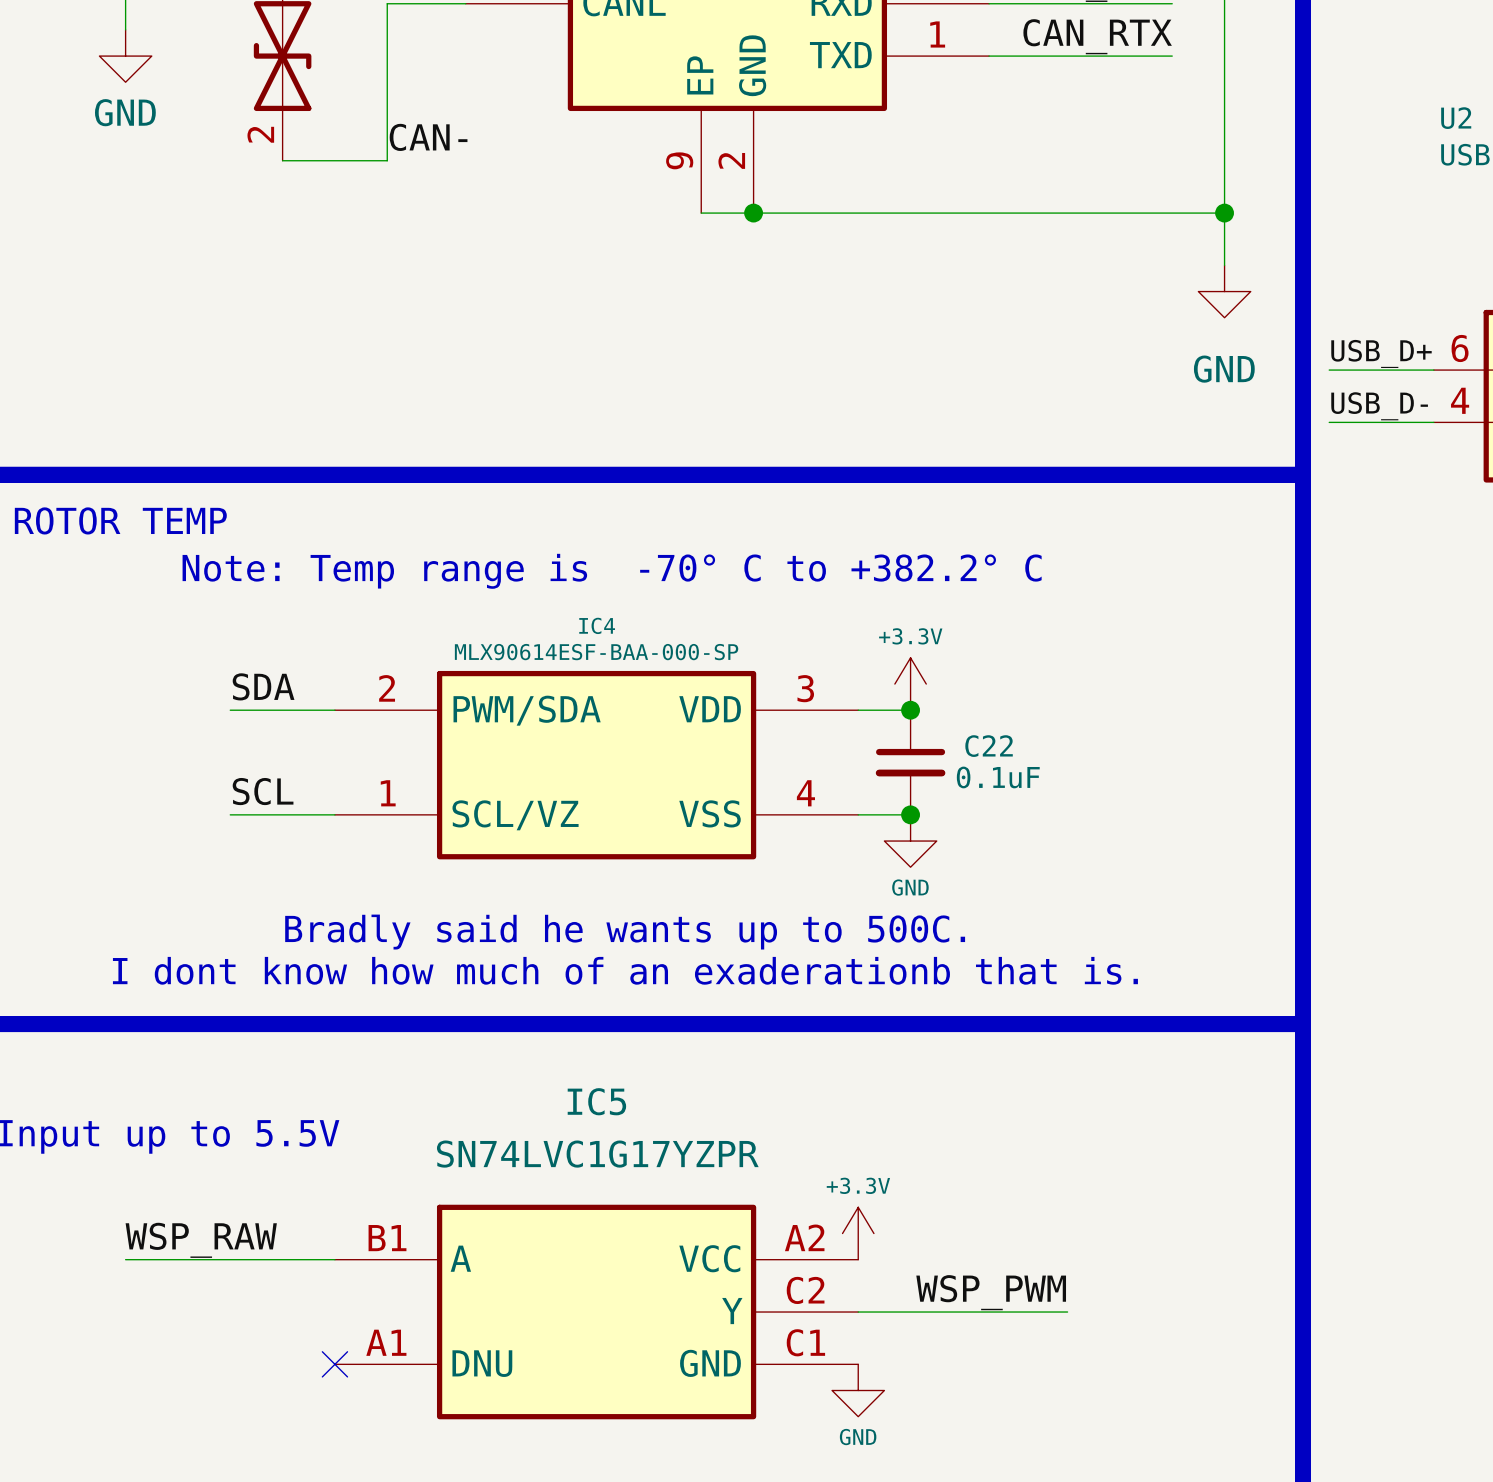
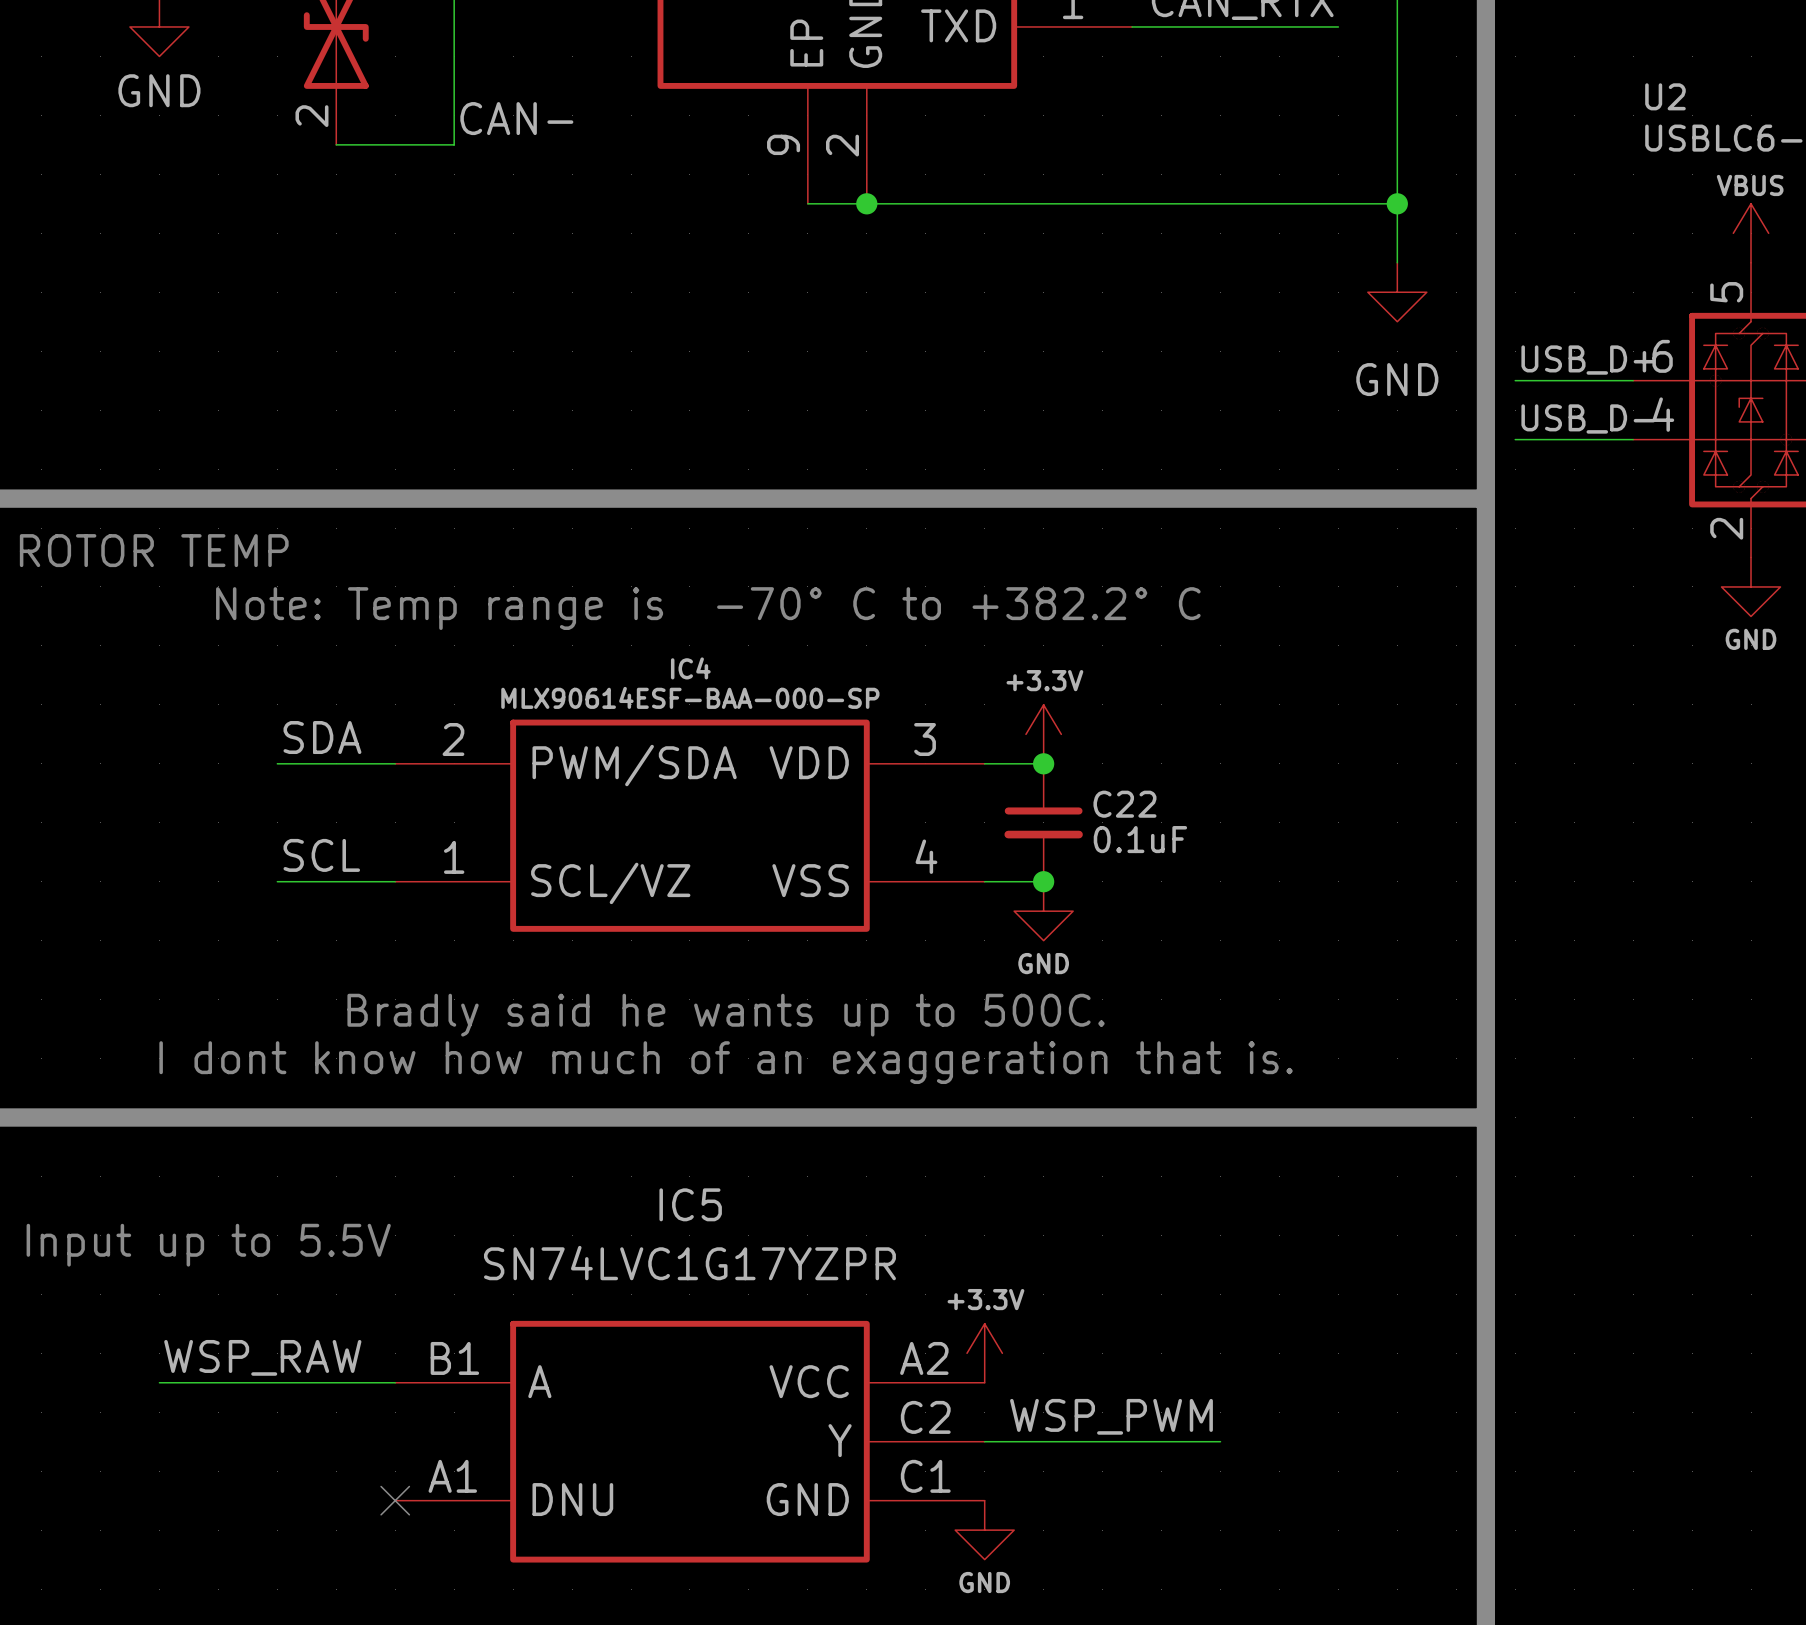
text: I dont know how much of an exaderationb that is. (625, 970) -> I dont know how much of an exaggeration that is. (726, 1062)

